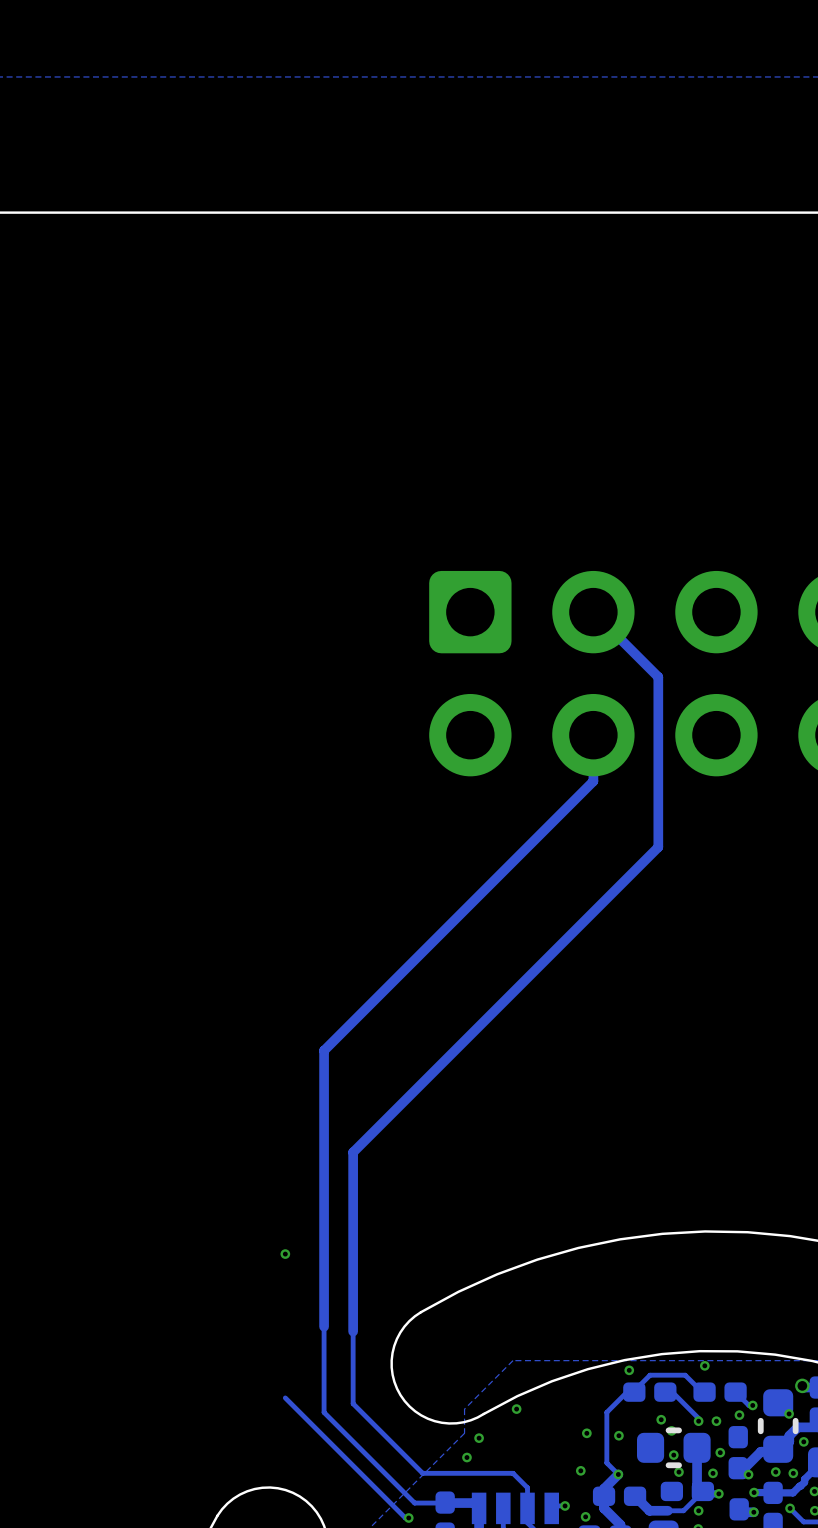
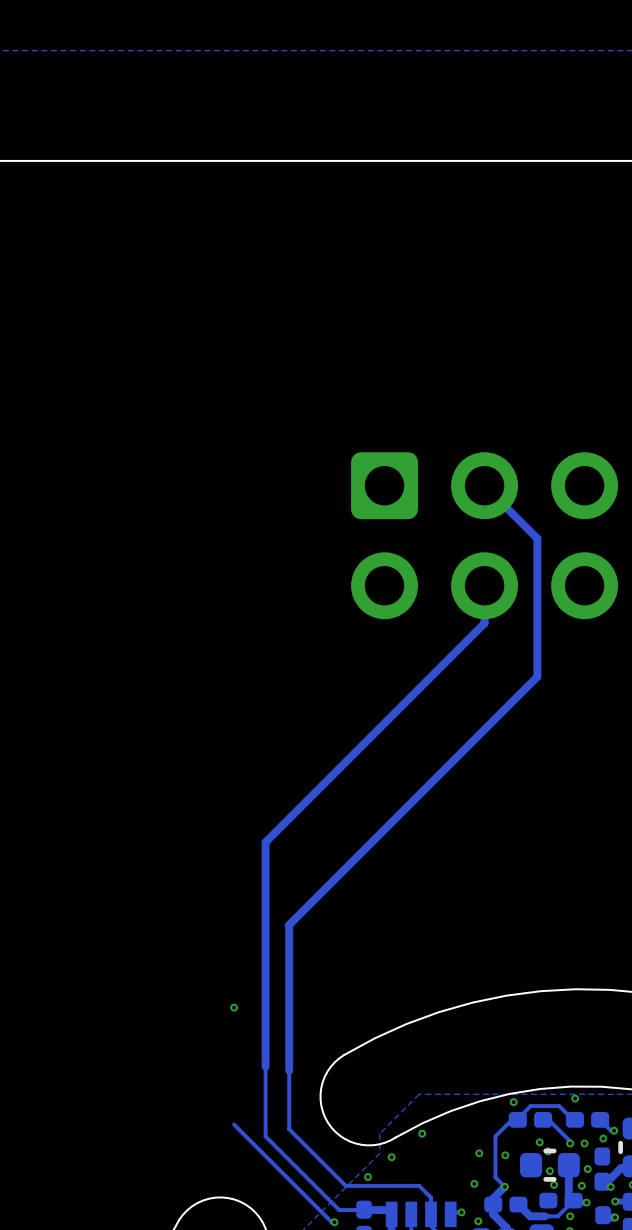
via position: (466, 1457) -> (368, 1176)

